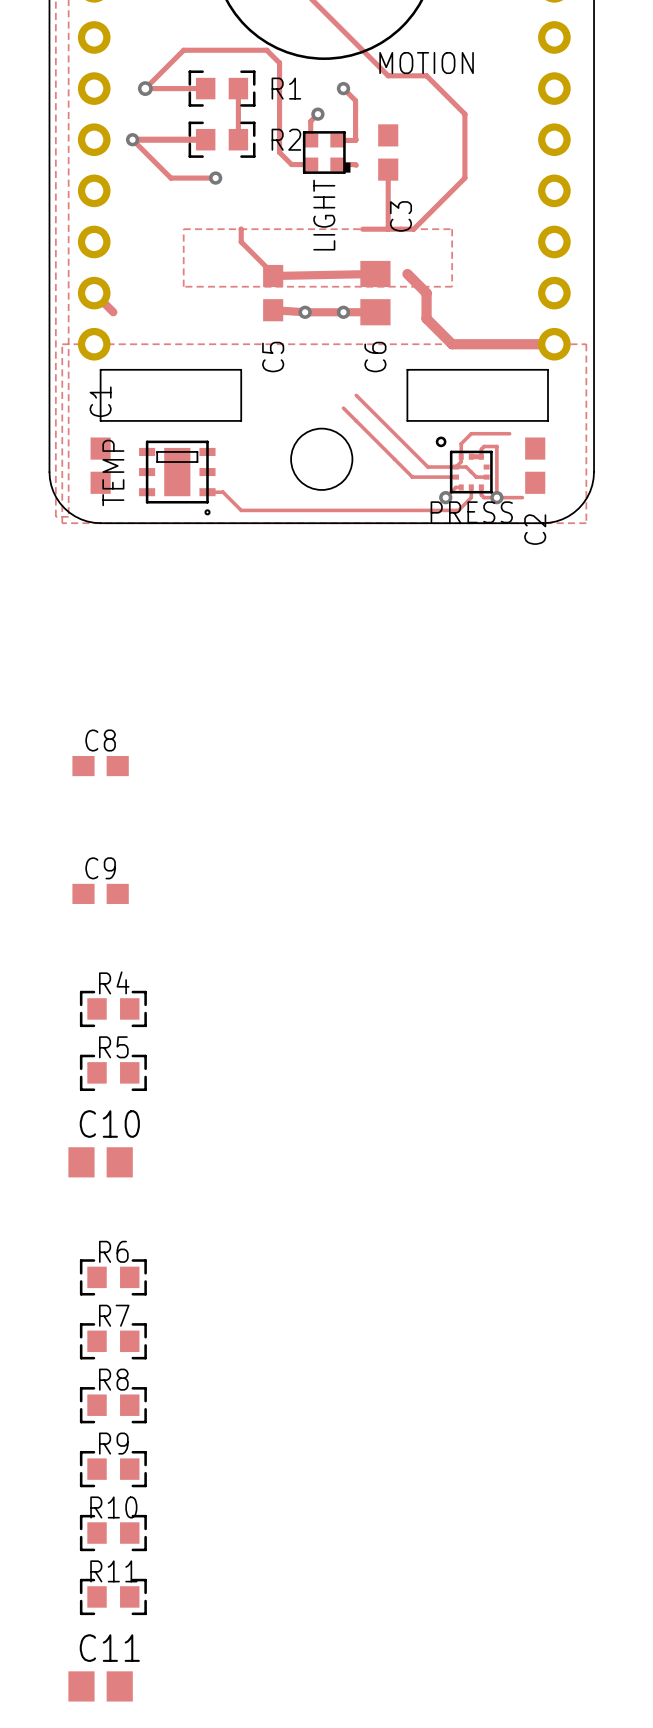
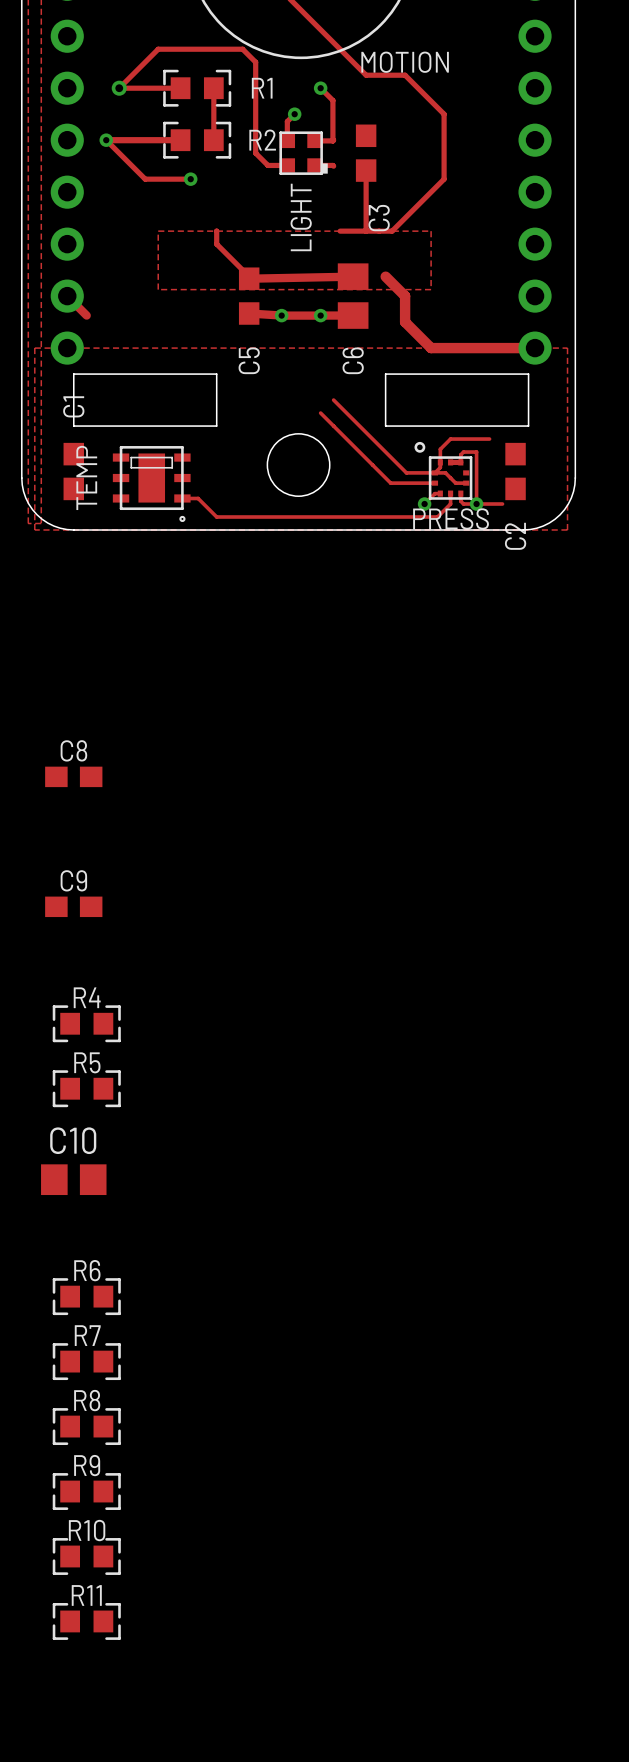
C11: (100, 1686) -> none

